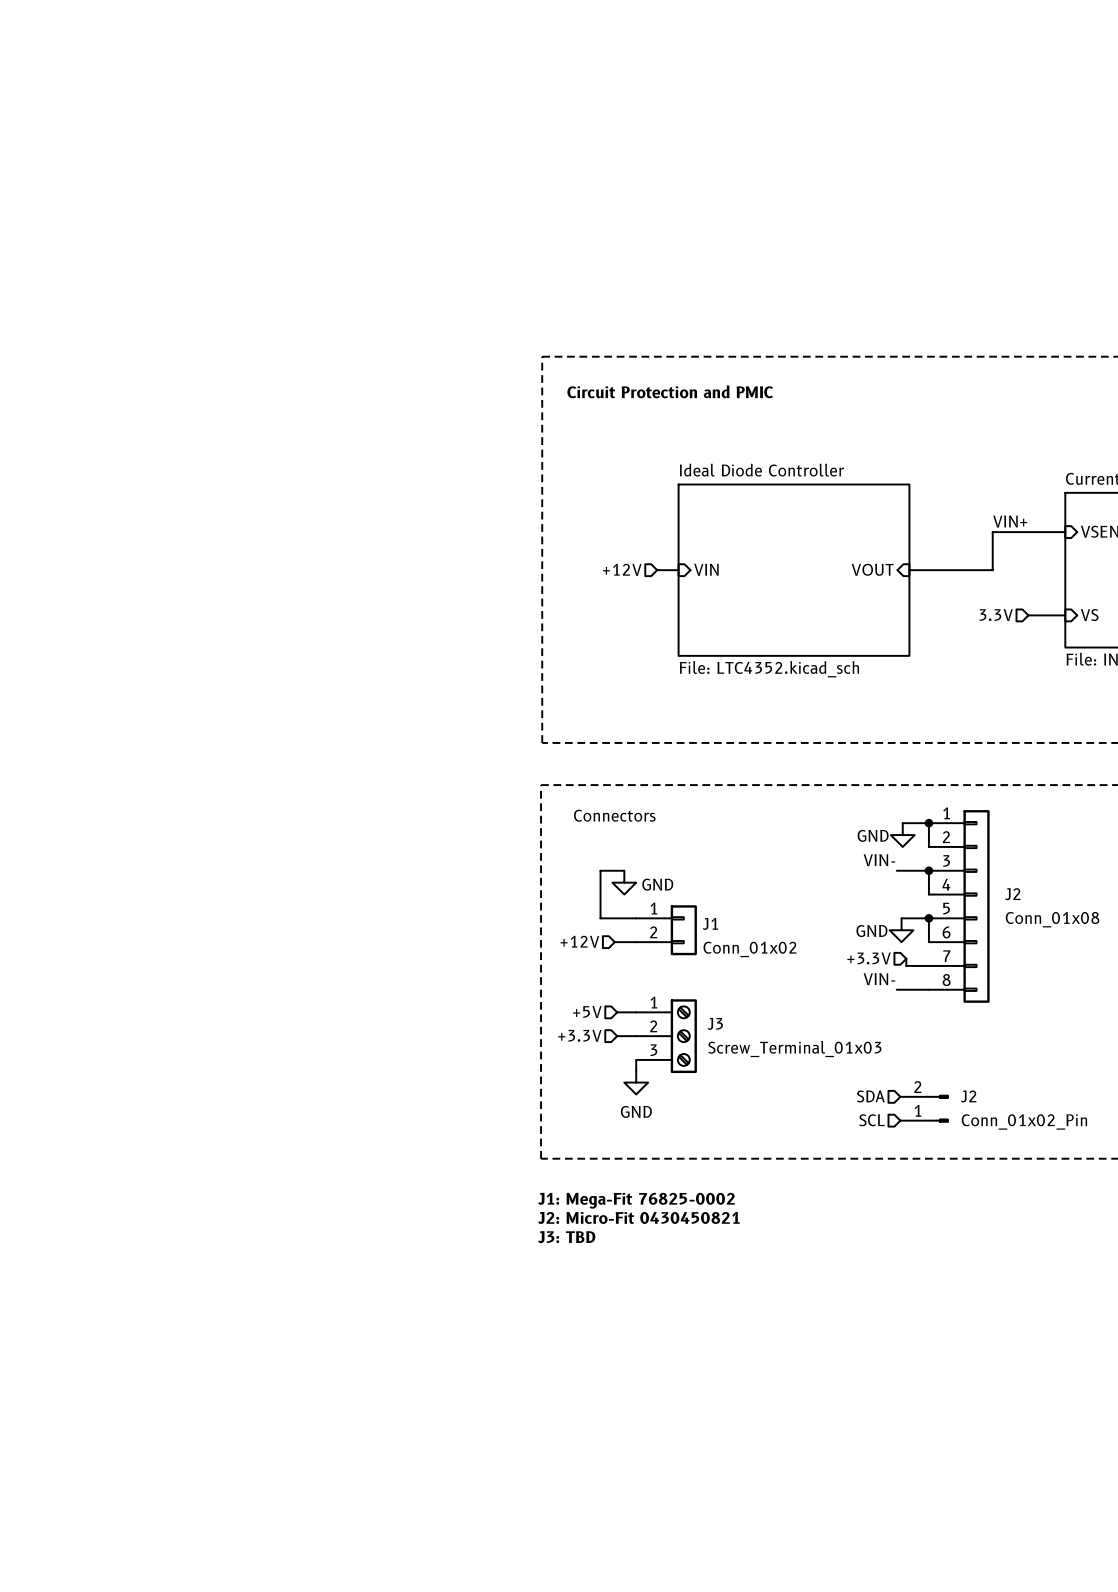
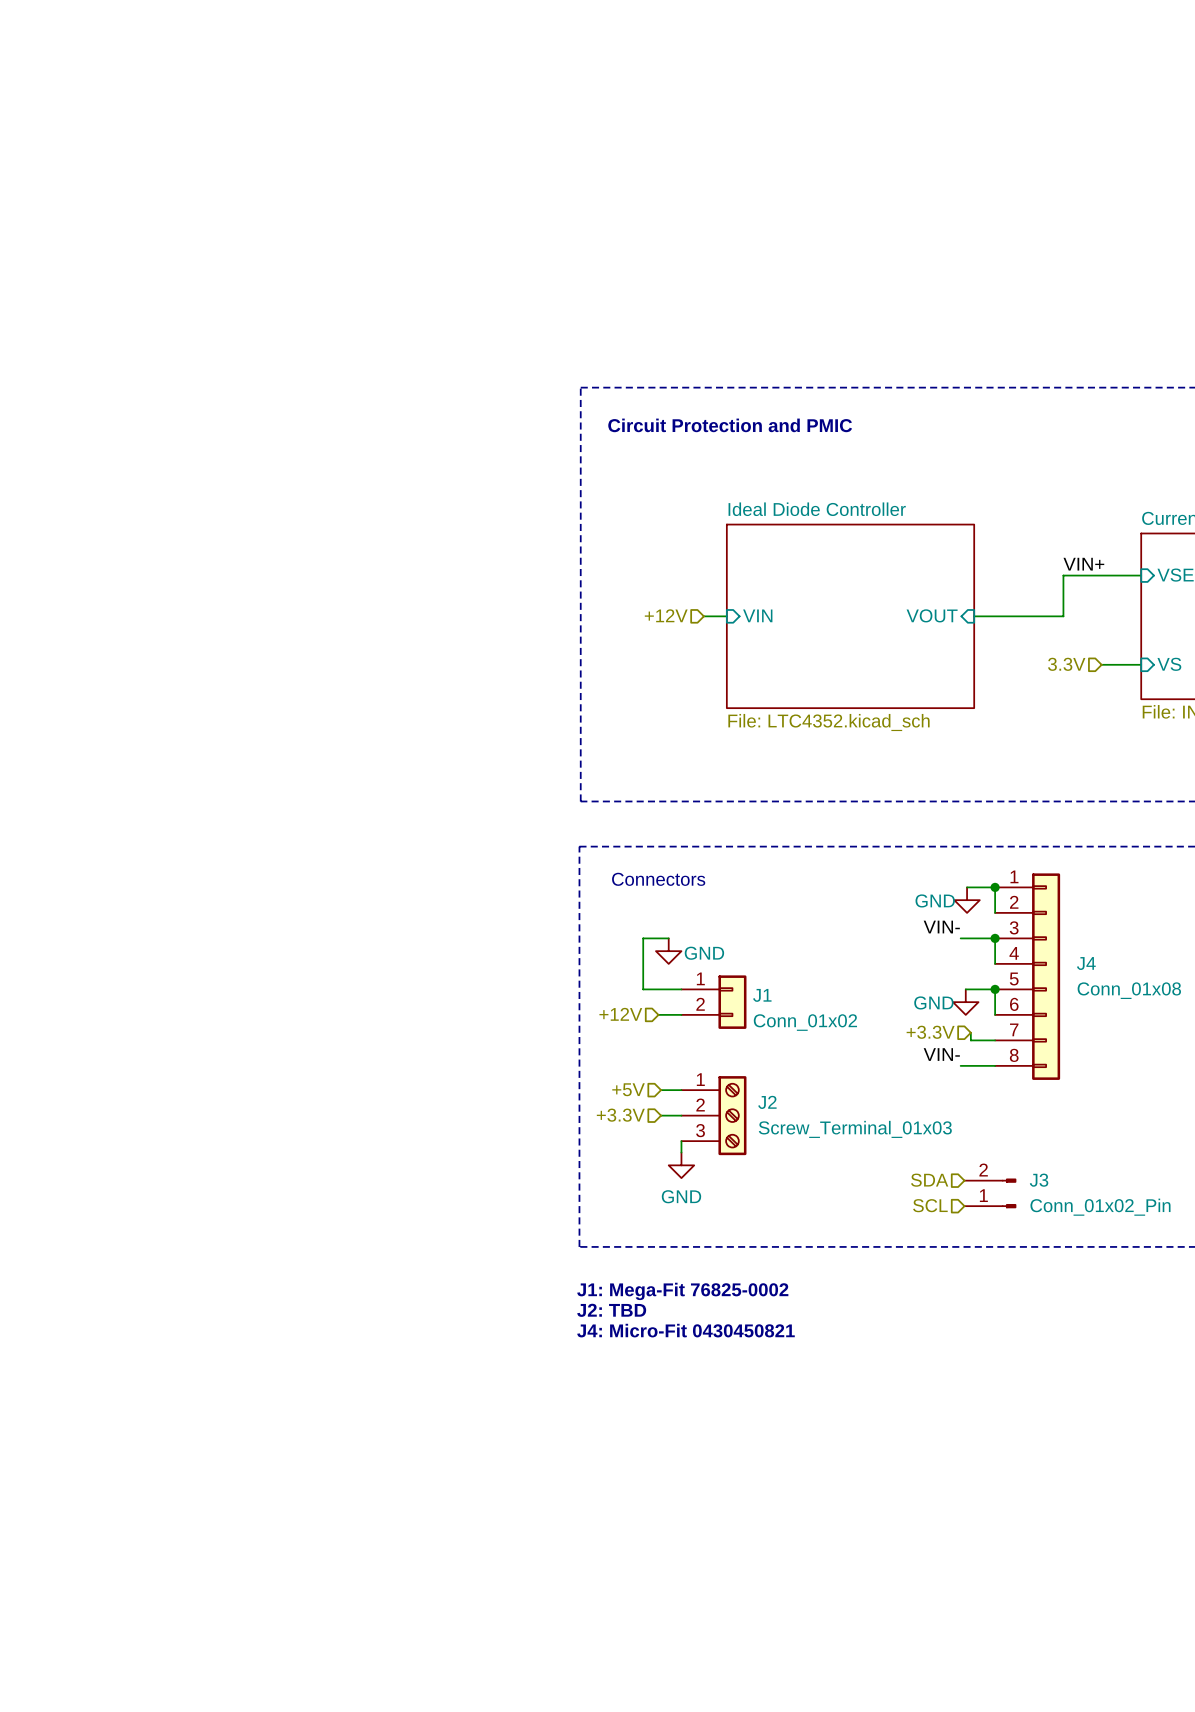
J2 name: J2 (1012, 894) -> J4 (1086, 963)
J3 name: J3 (715, 1023) -> J2 (767, 1102)
J2 name: J2 (968, 1096) -> J3 (1039, 1180)
text: J2: Micro-Fit 0430450821 (638, 1217) -> J2: TBD (611, 1310)
text: J3: TBD (566, 1237) -> J4: Micro-Fit 0430450821 (685, 1330)

